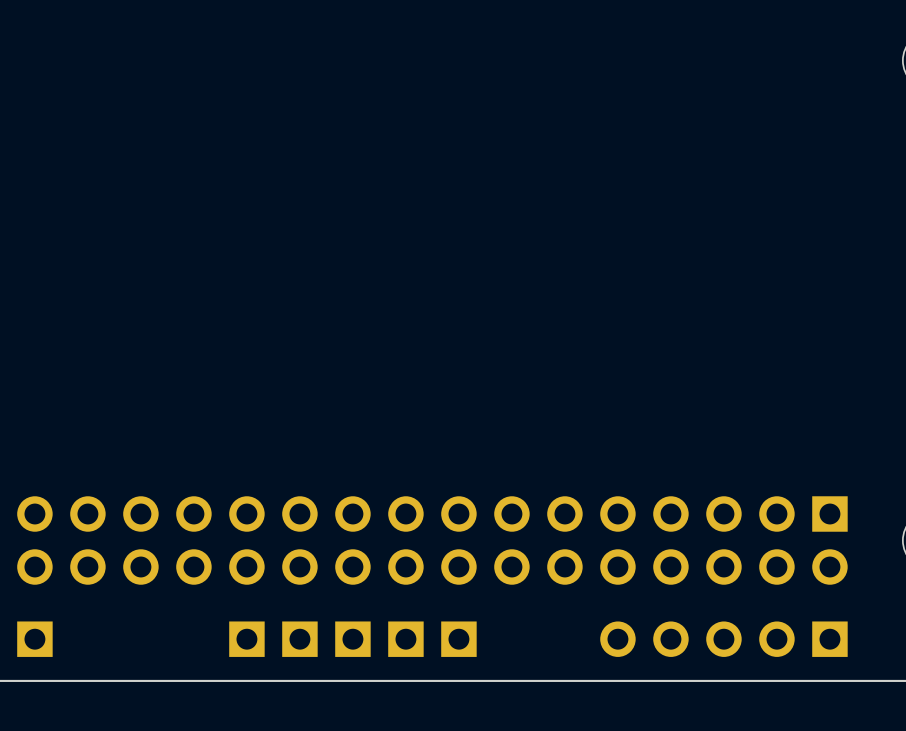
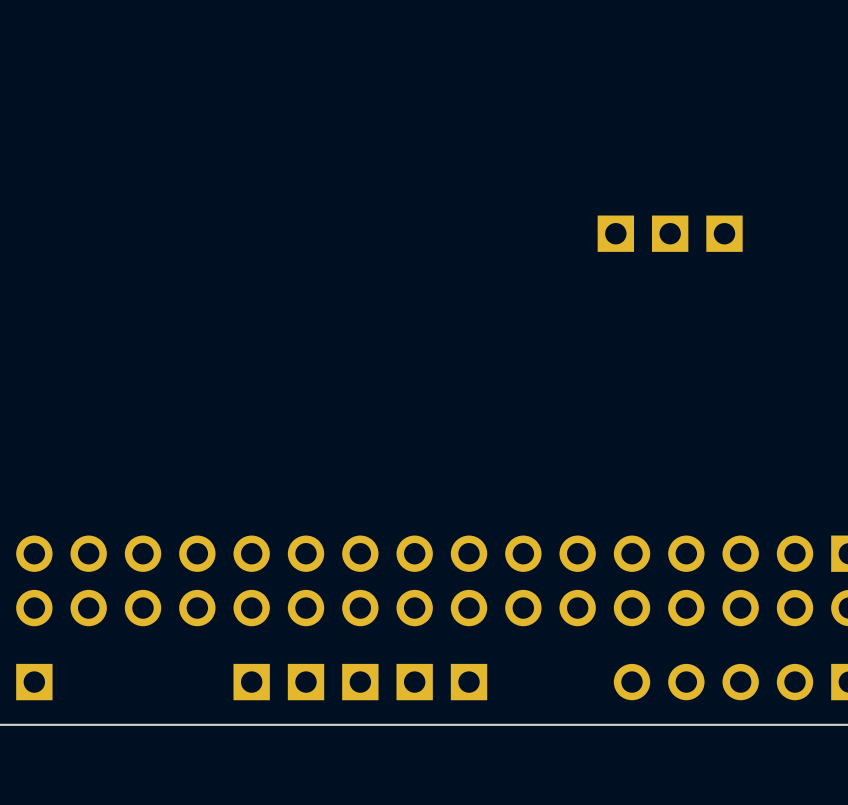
part: none -> (615, 233)
part: none -> (670, 233)
part: none -> (724, 233)

